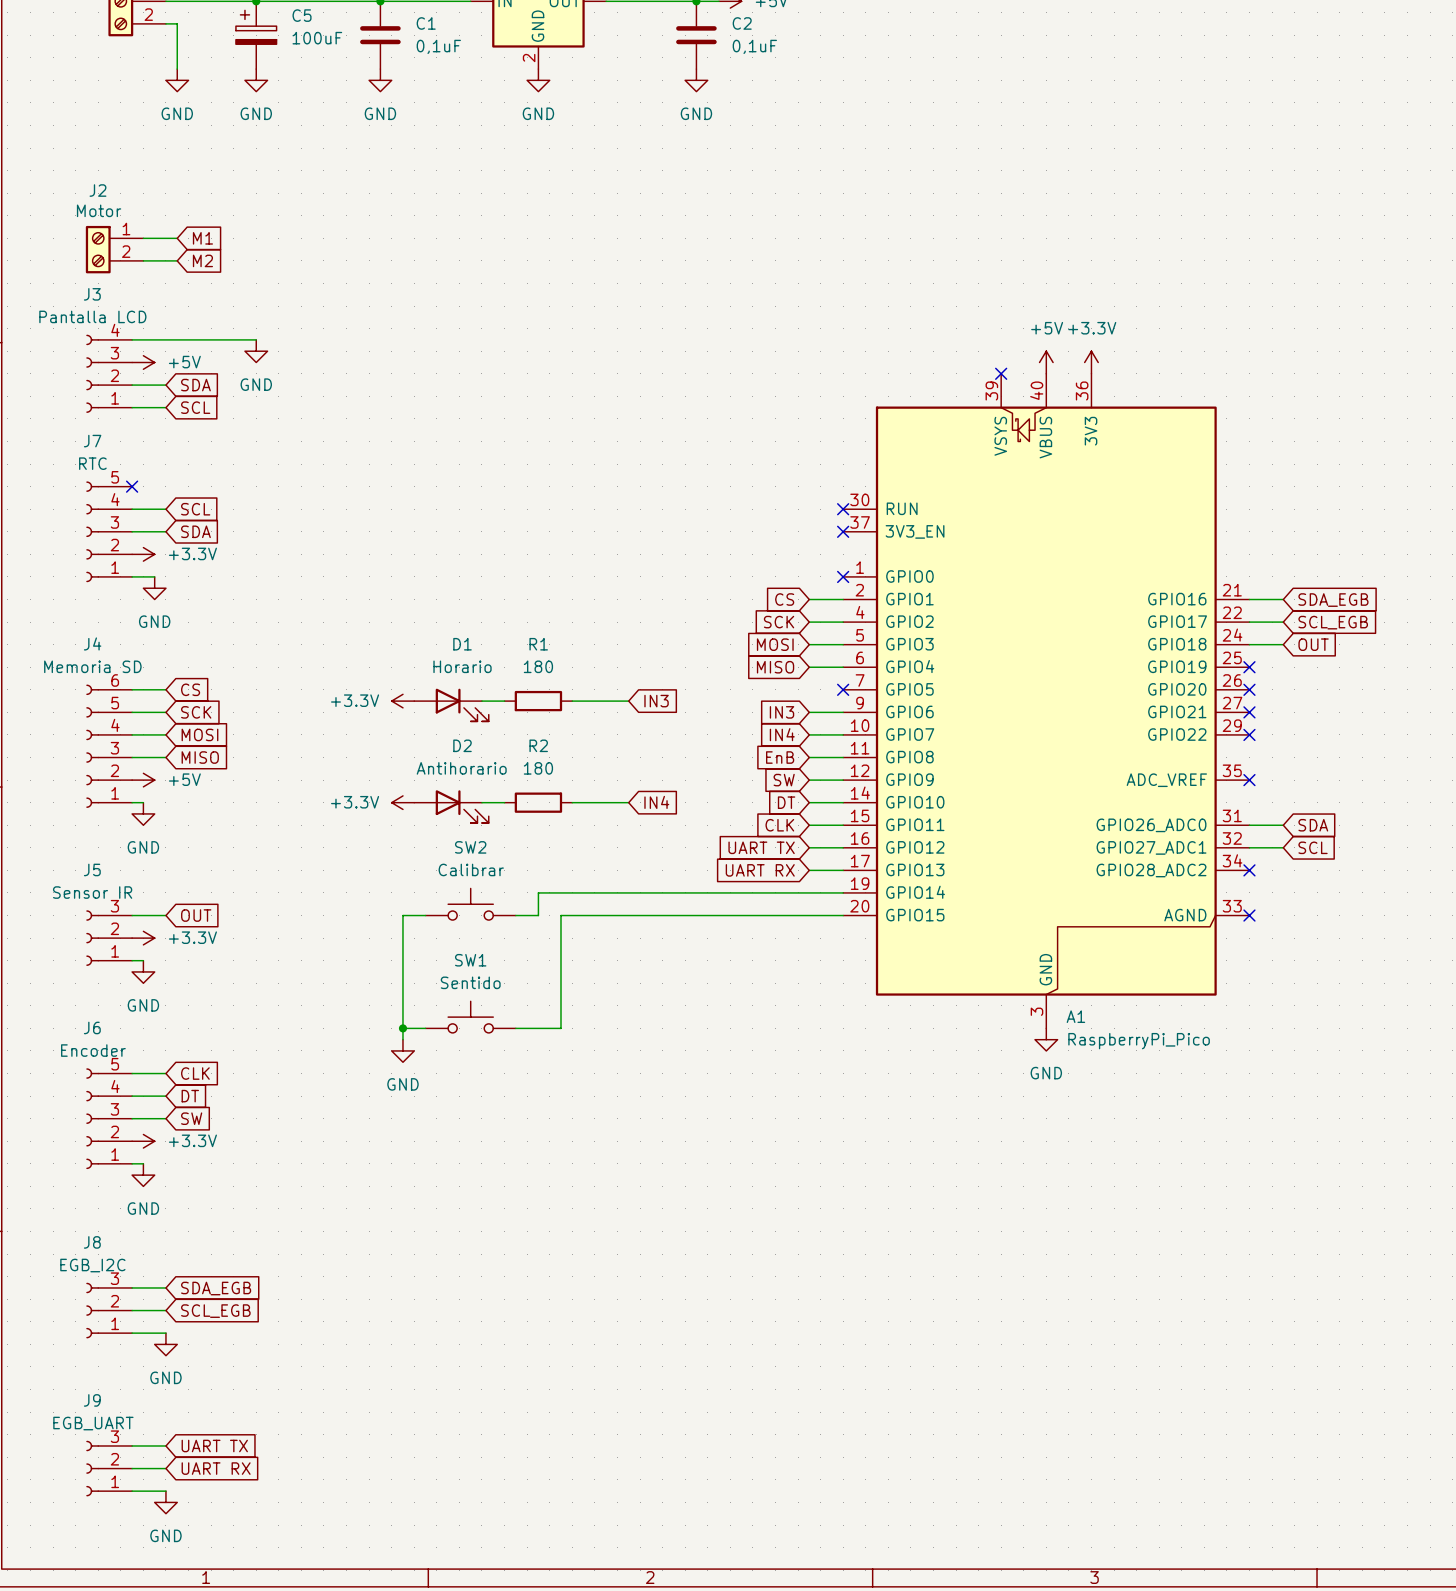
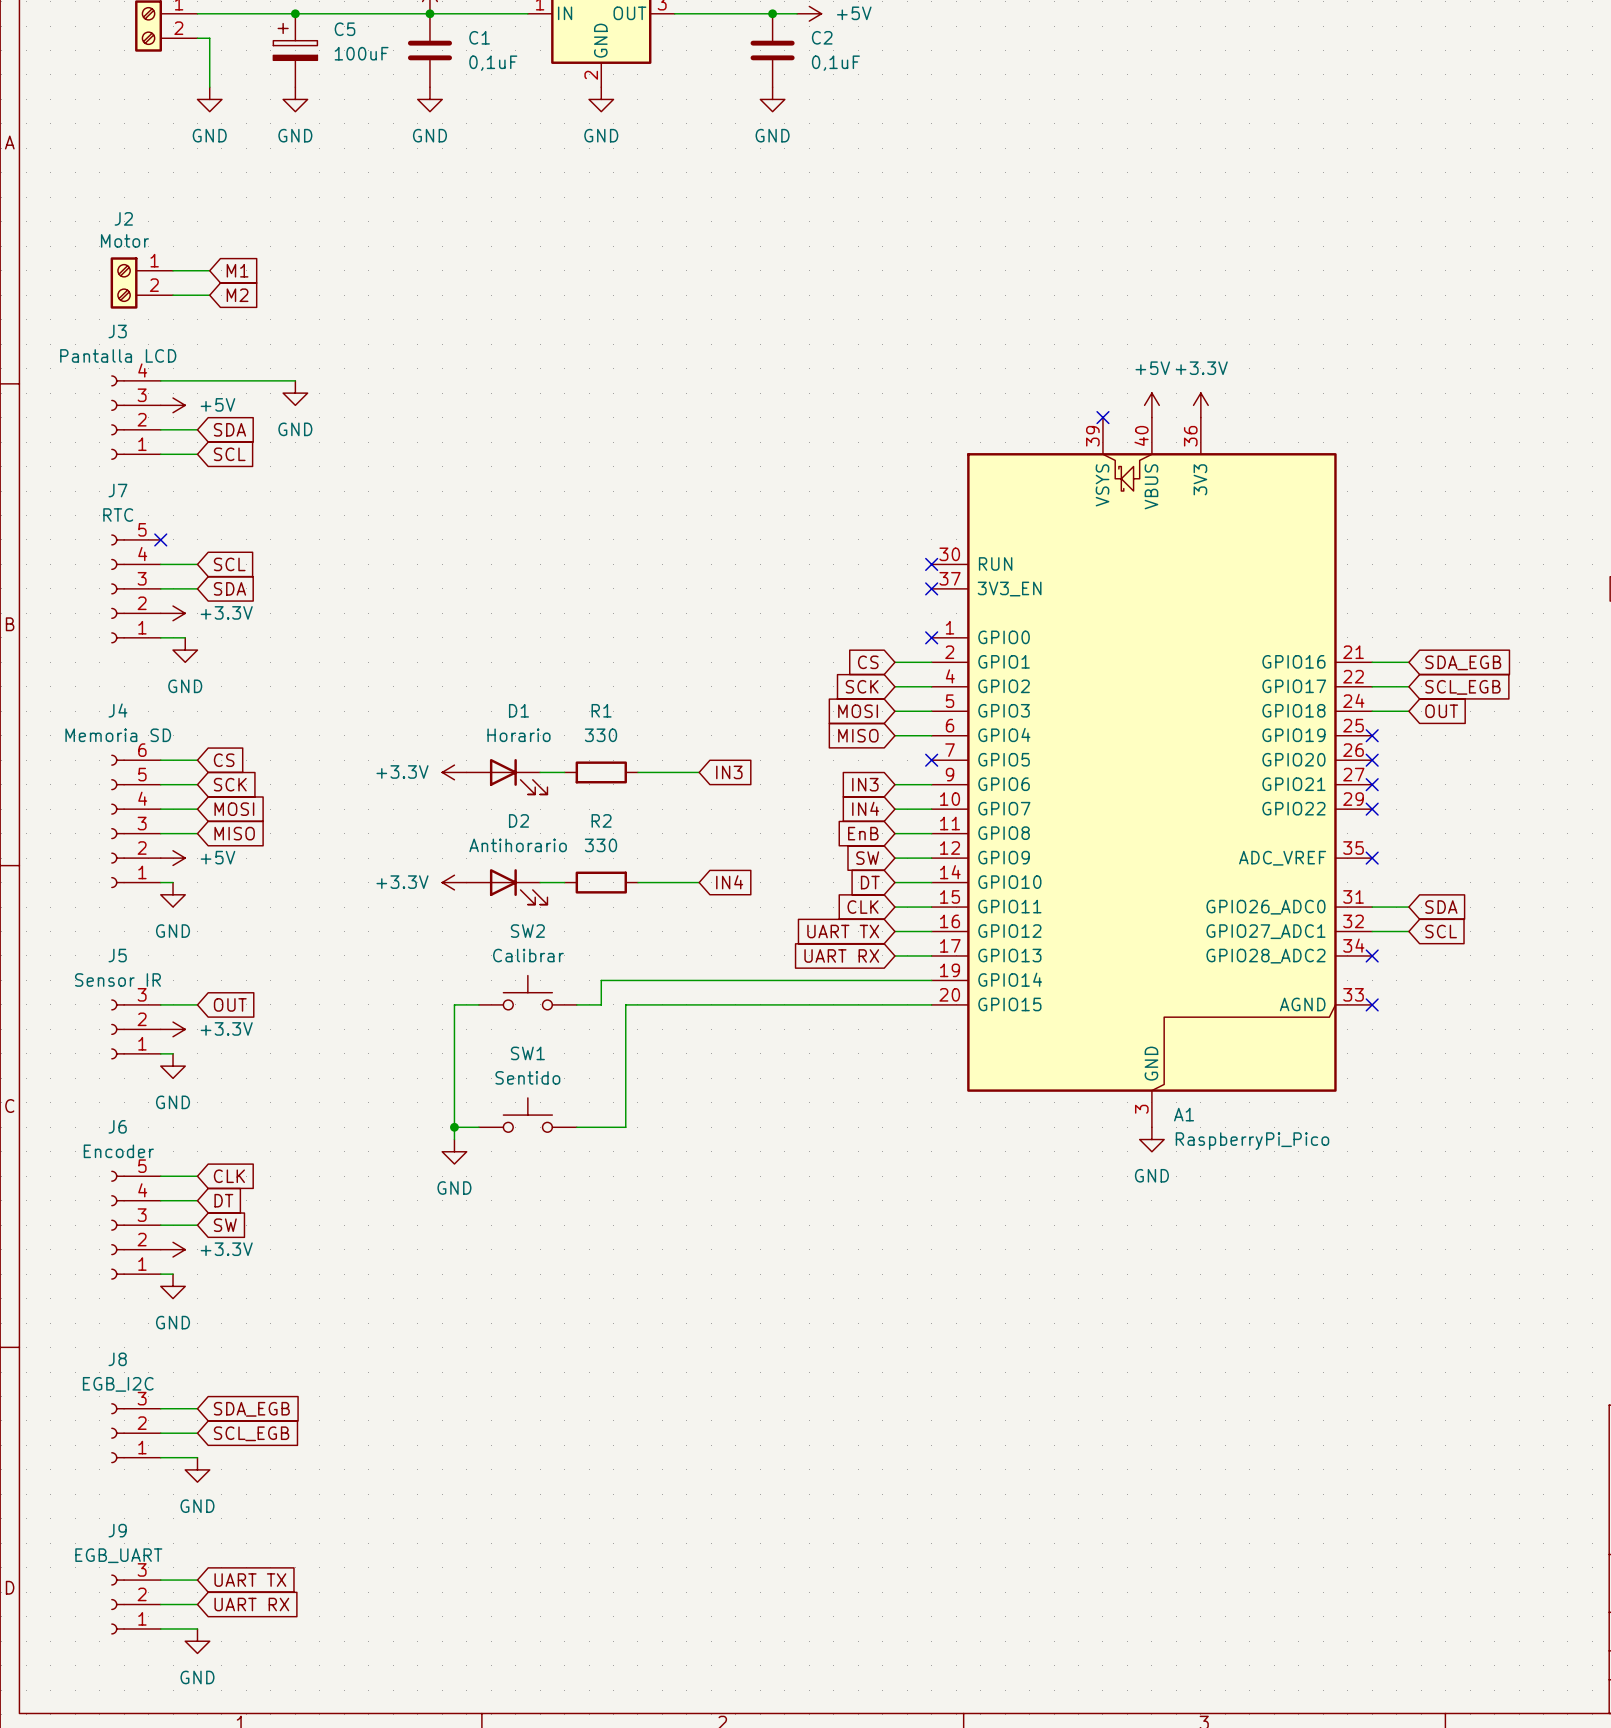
R1 value: 180 (538, 666) -> 330 (600, 735)
R2 value: 180 (538, 768) -> 330 (600, 845)

